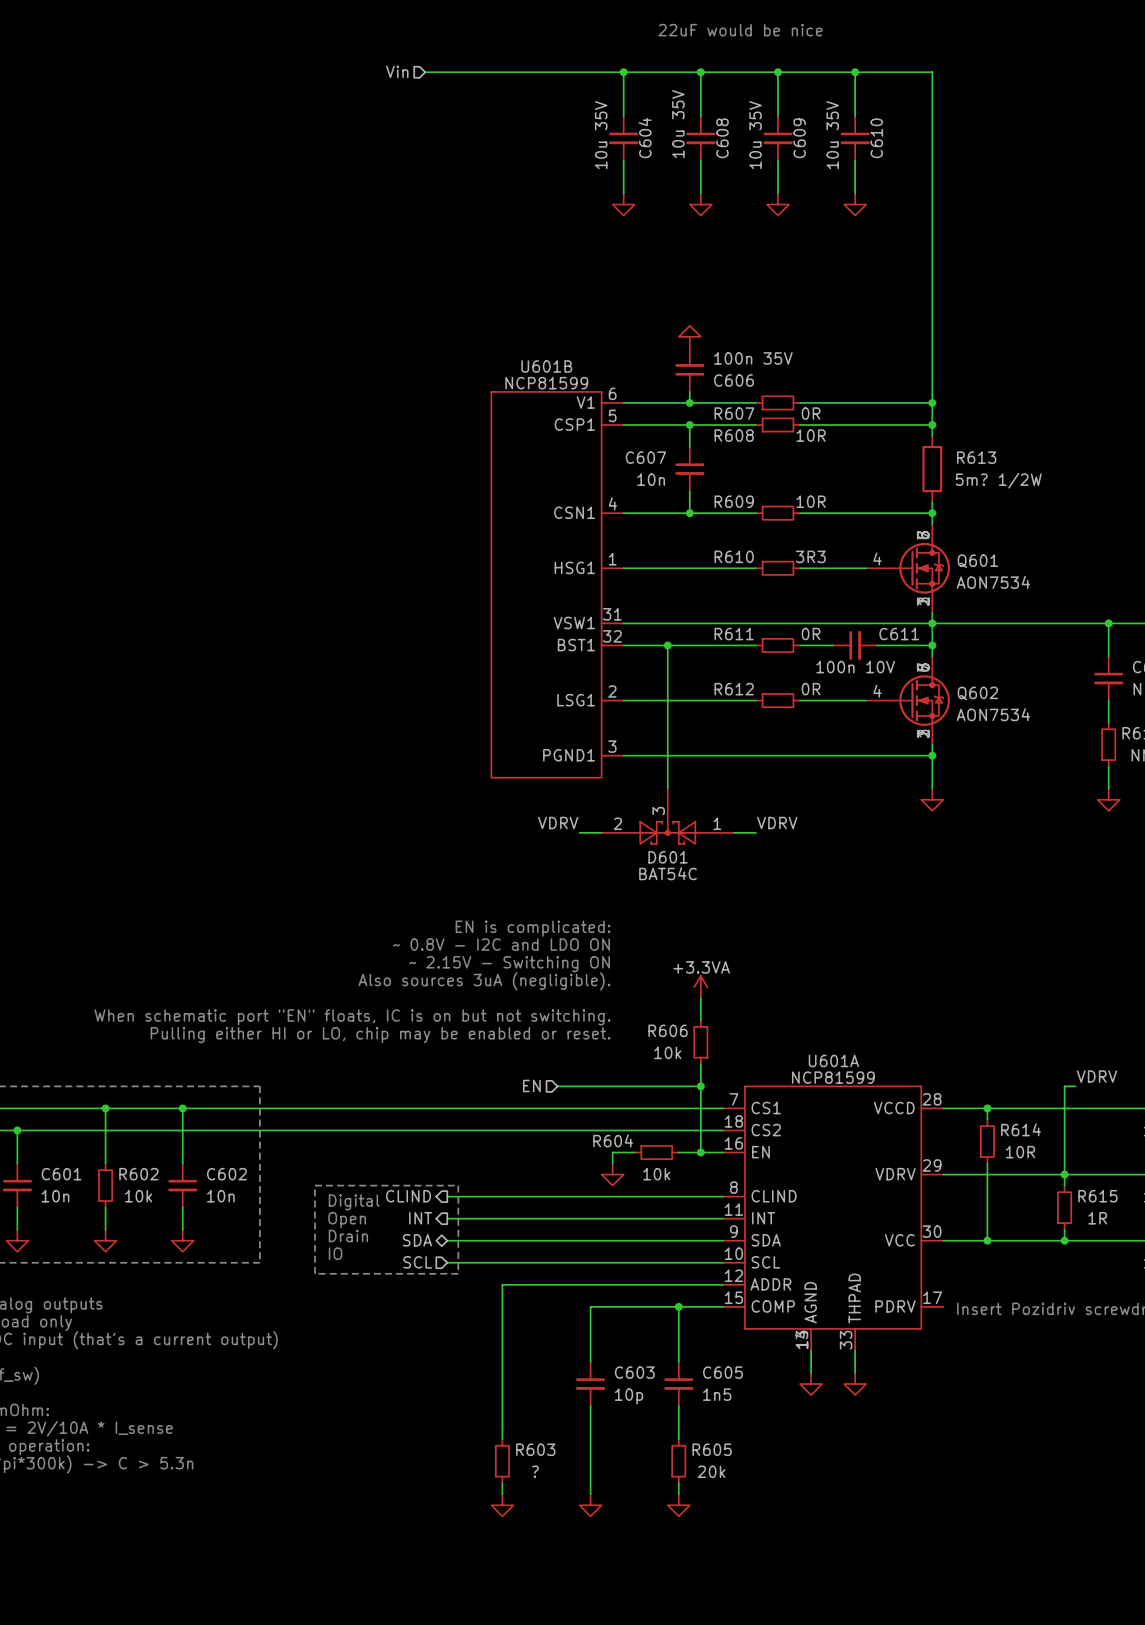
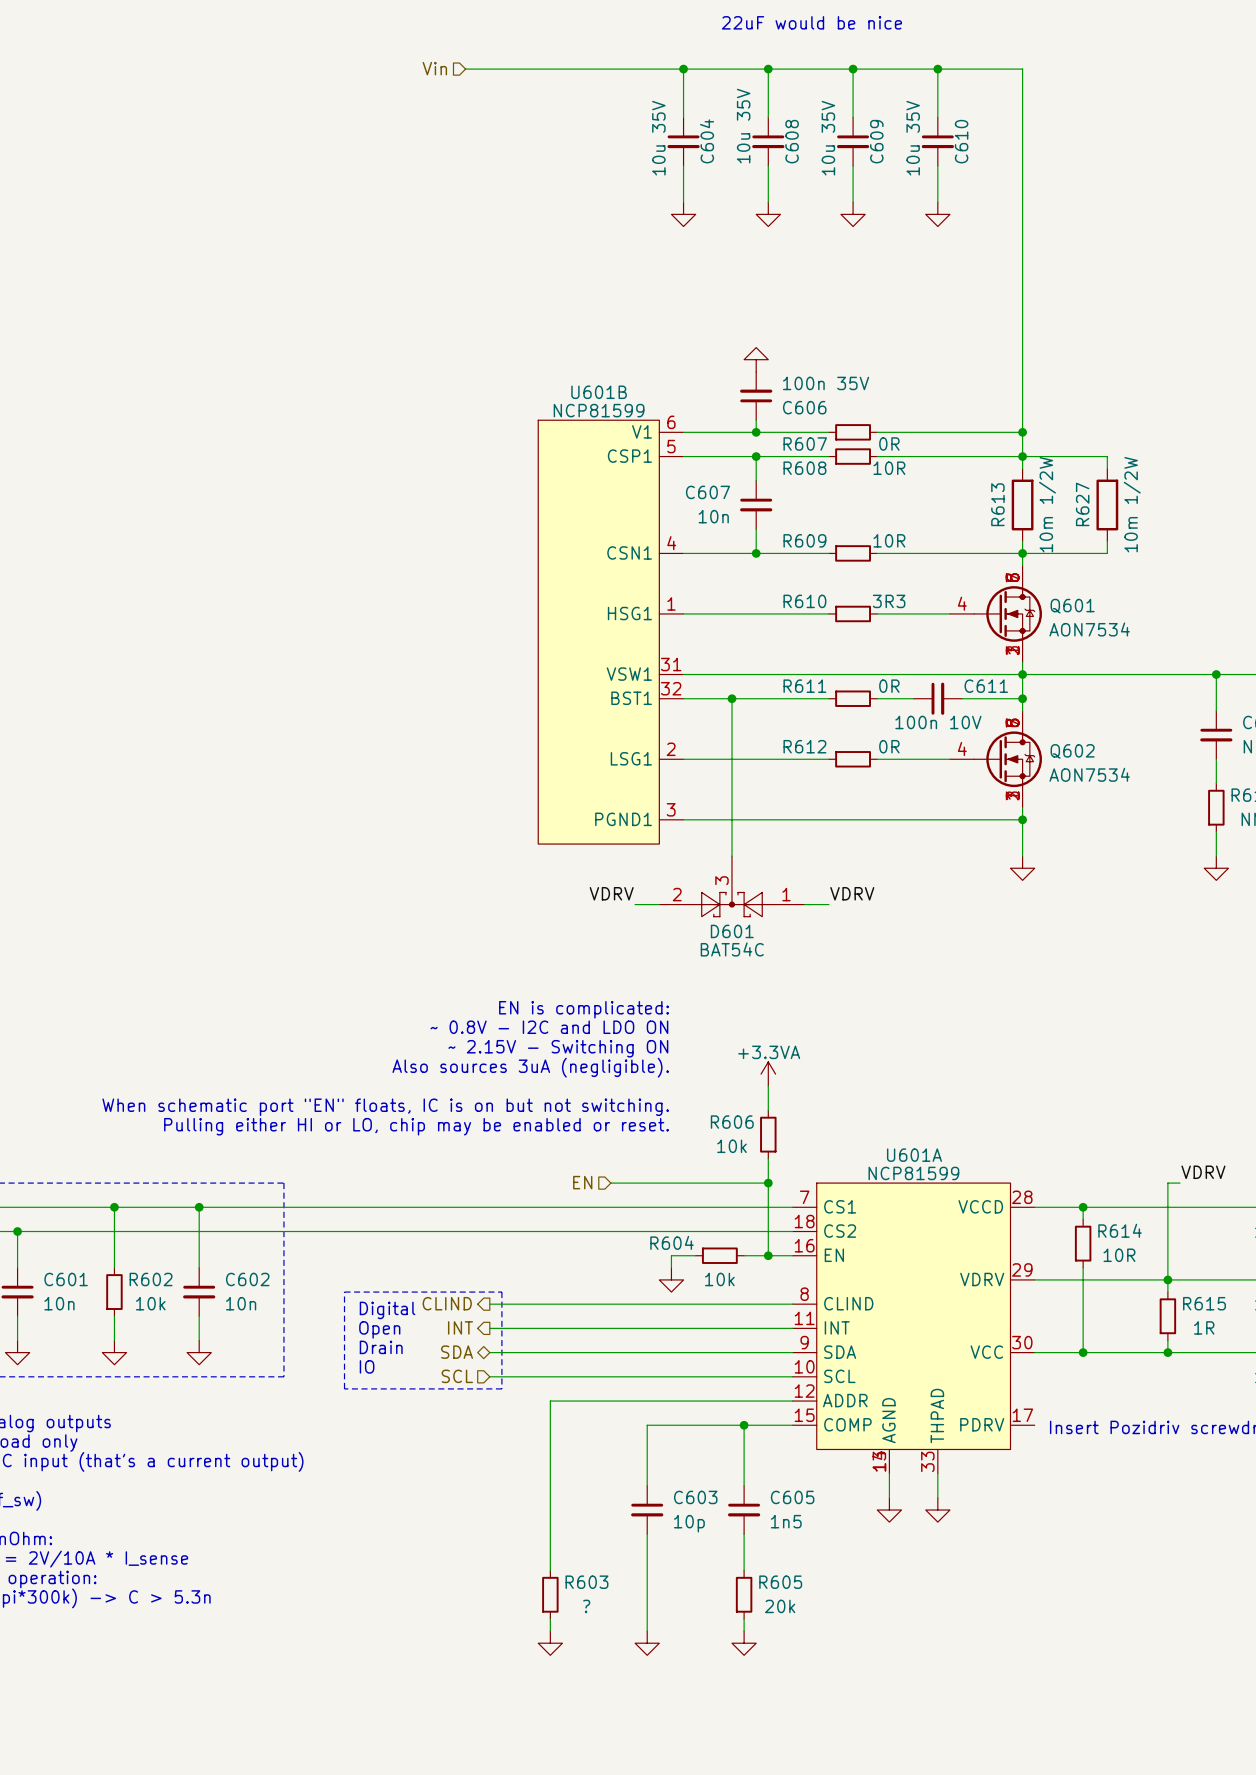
wire: none -> (1022, 456) (1107, 456) (1107, 468)
R613 name rotation: 0° (976, 457) -> 90° counterclockwise (997, 504)
R613 name position: R613 (976, 457) -> R613 (997, 504)
R627: none -> 10m 1/2W (1107, 504)
R613 value: 5m? 1/2W (998, 480) -> 10m 1/2W (1047, 504)
wire: none -> (1107, 541) (1107, 553) (1022, 553)

